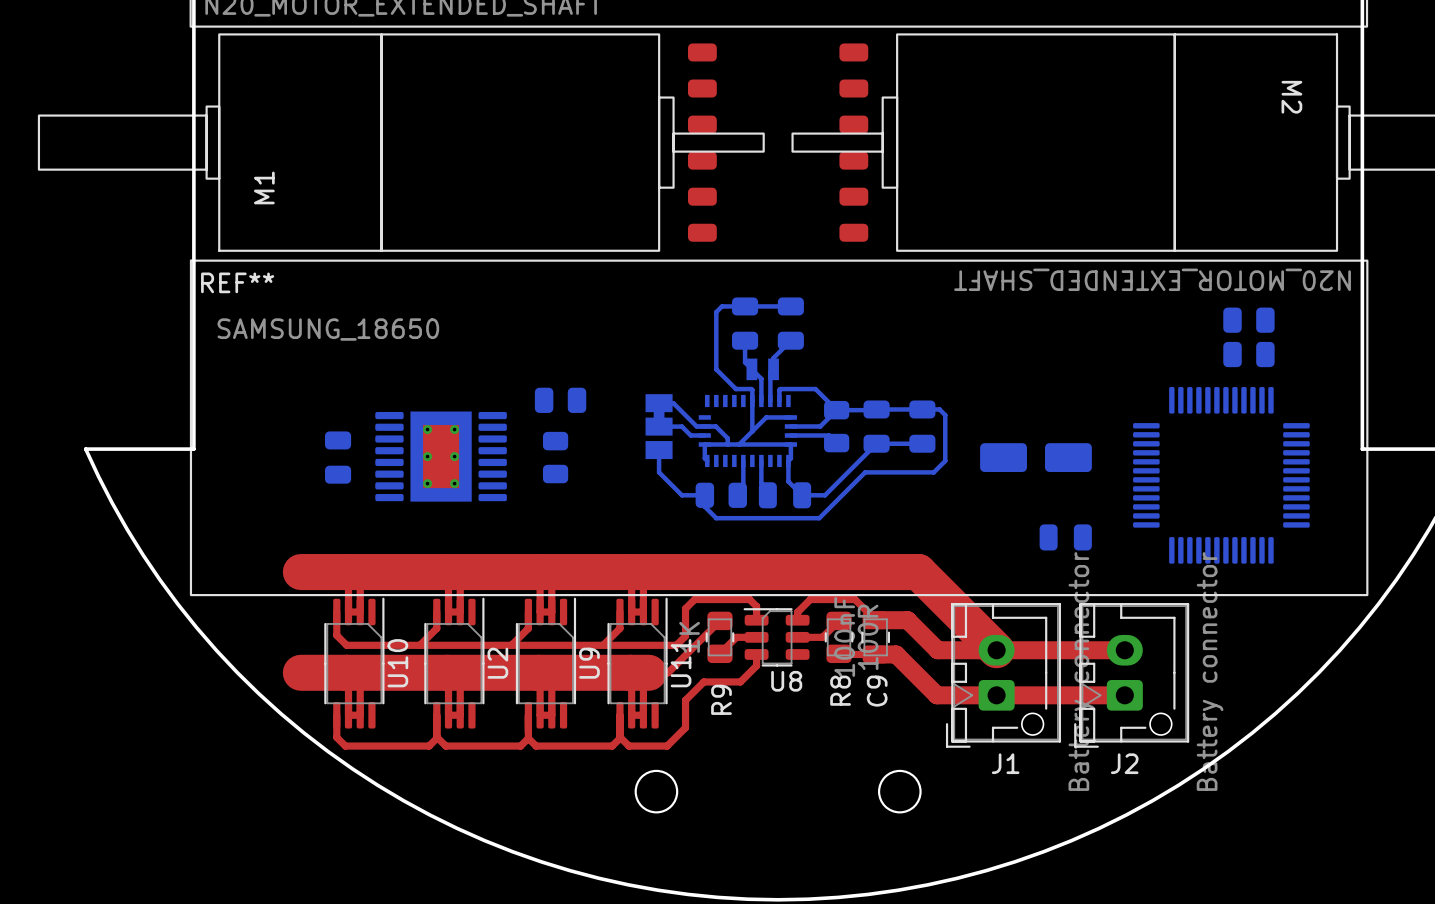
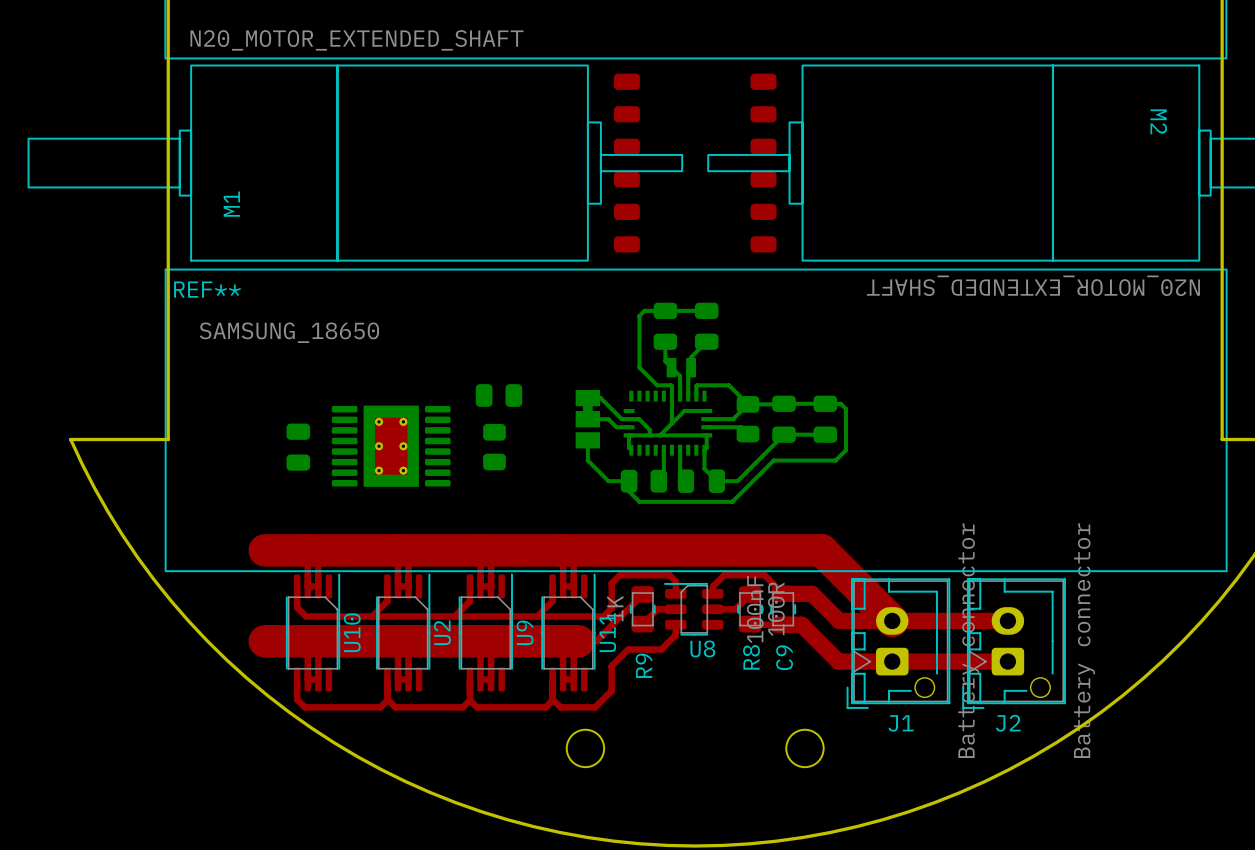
part: (1248, 320) -> none
part: (1248, 354) -> none
part: (1035, 457) -> none
part: (1221, 475) -> none
part: (1065, 537) -> none

